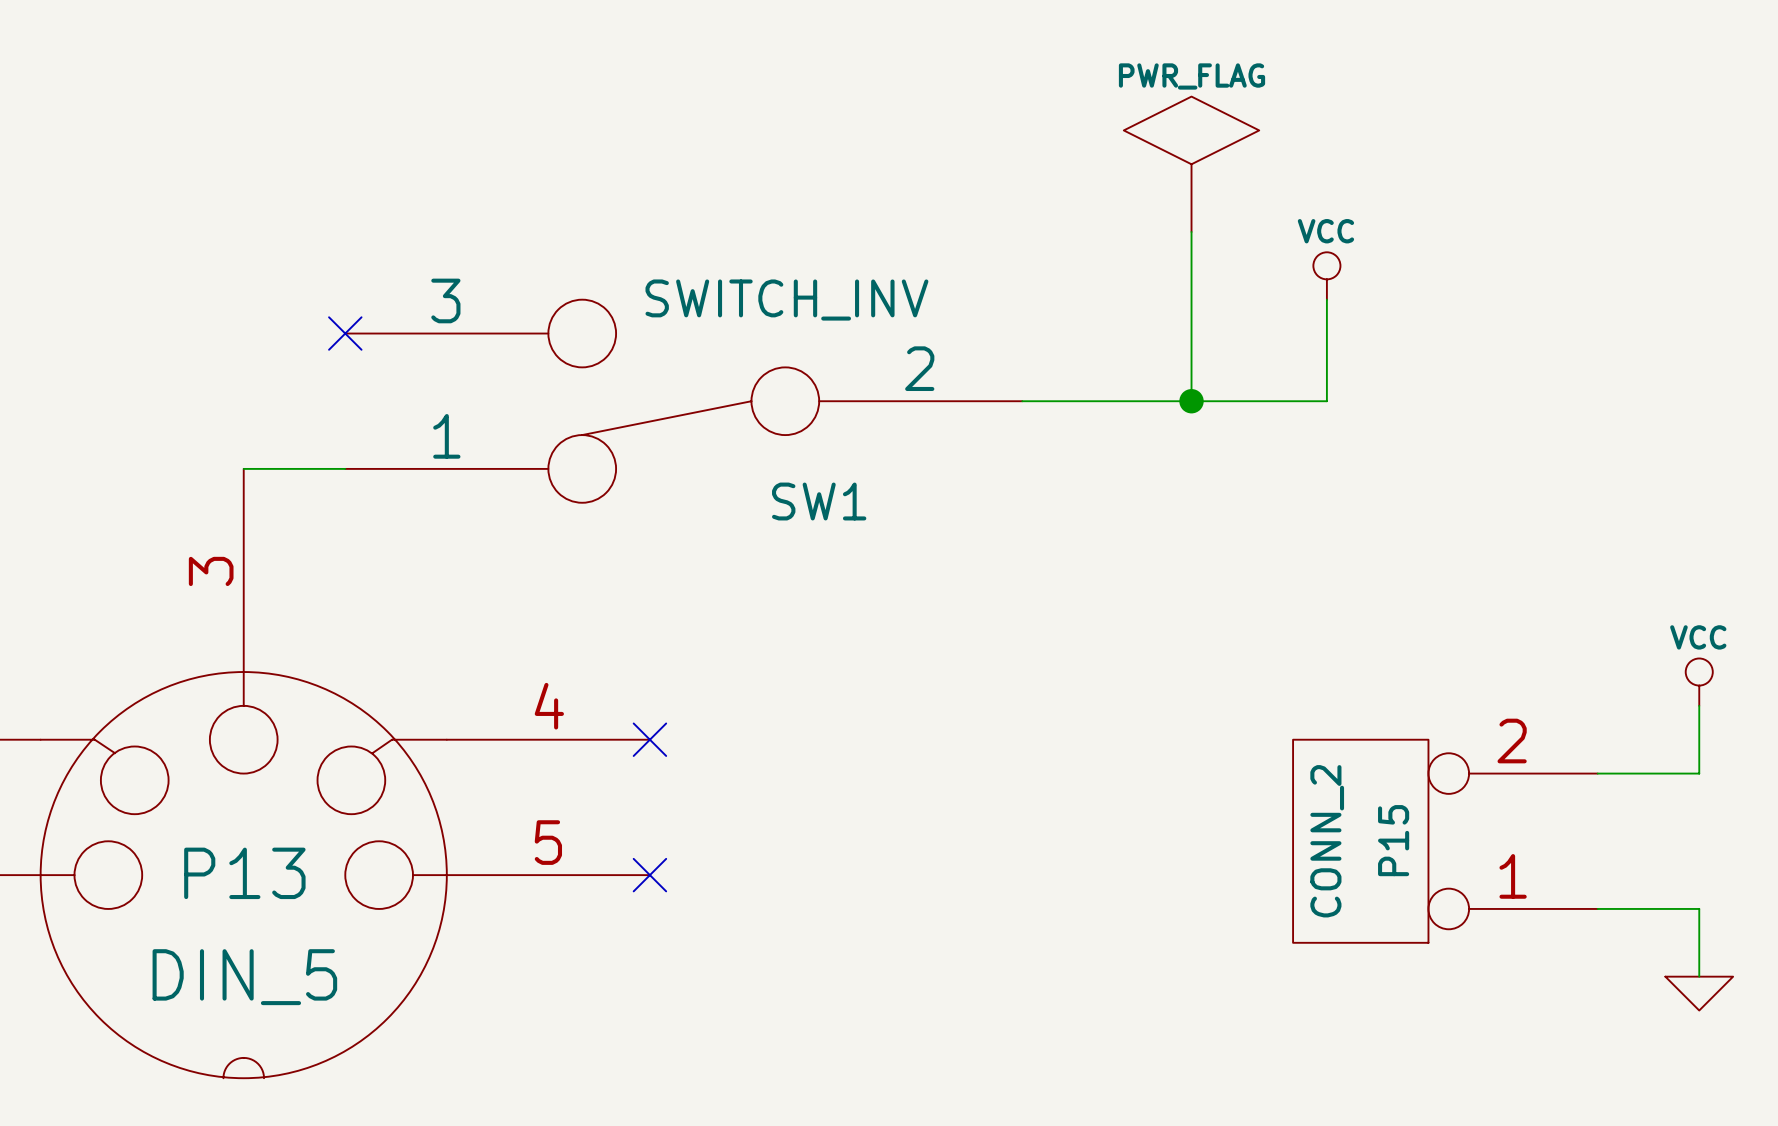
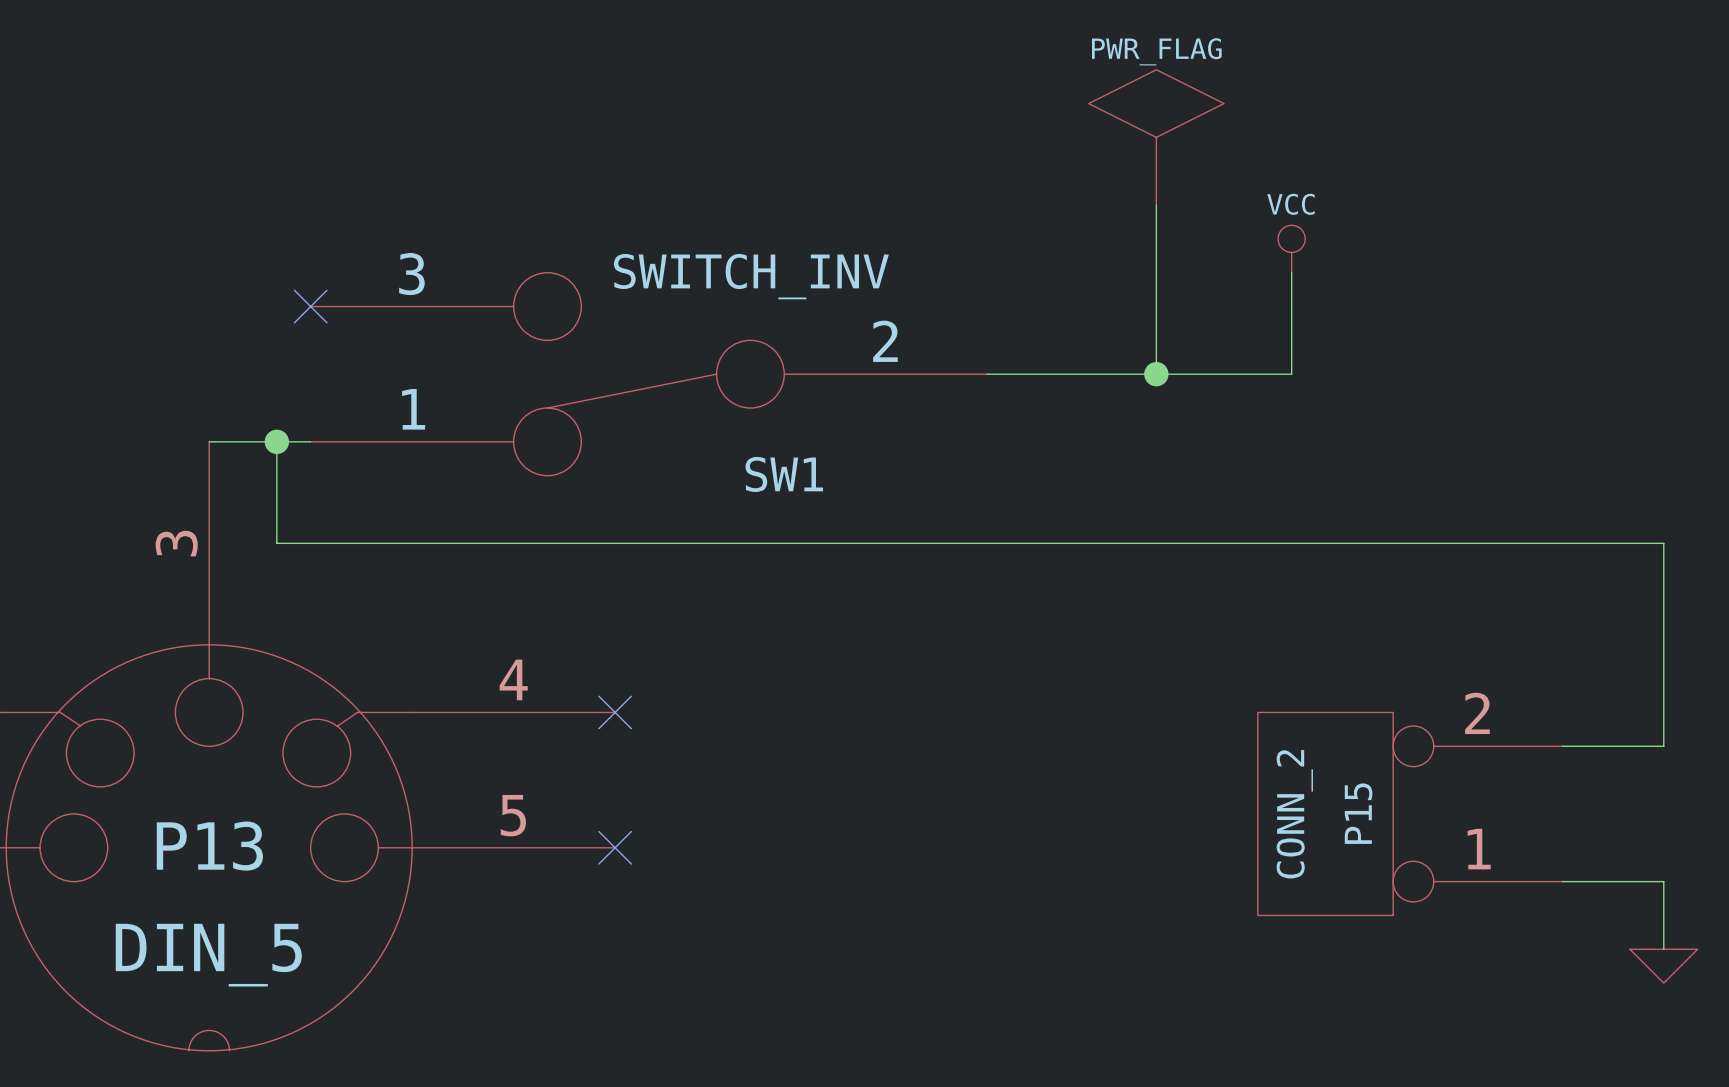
wire: none -> (276, 441) (276, 543) (1663, 543) (1663, 678)
junction: none -> (276, 441)
power symbol: VCC (1699, 682) -> none

